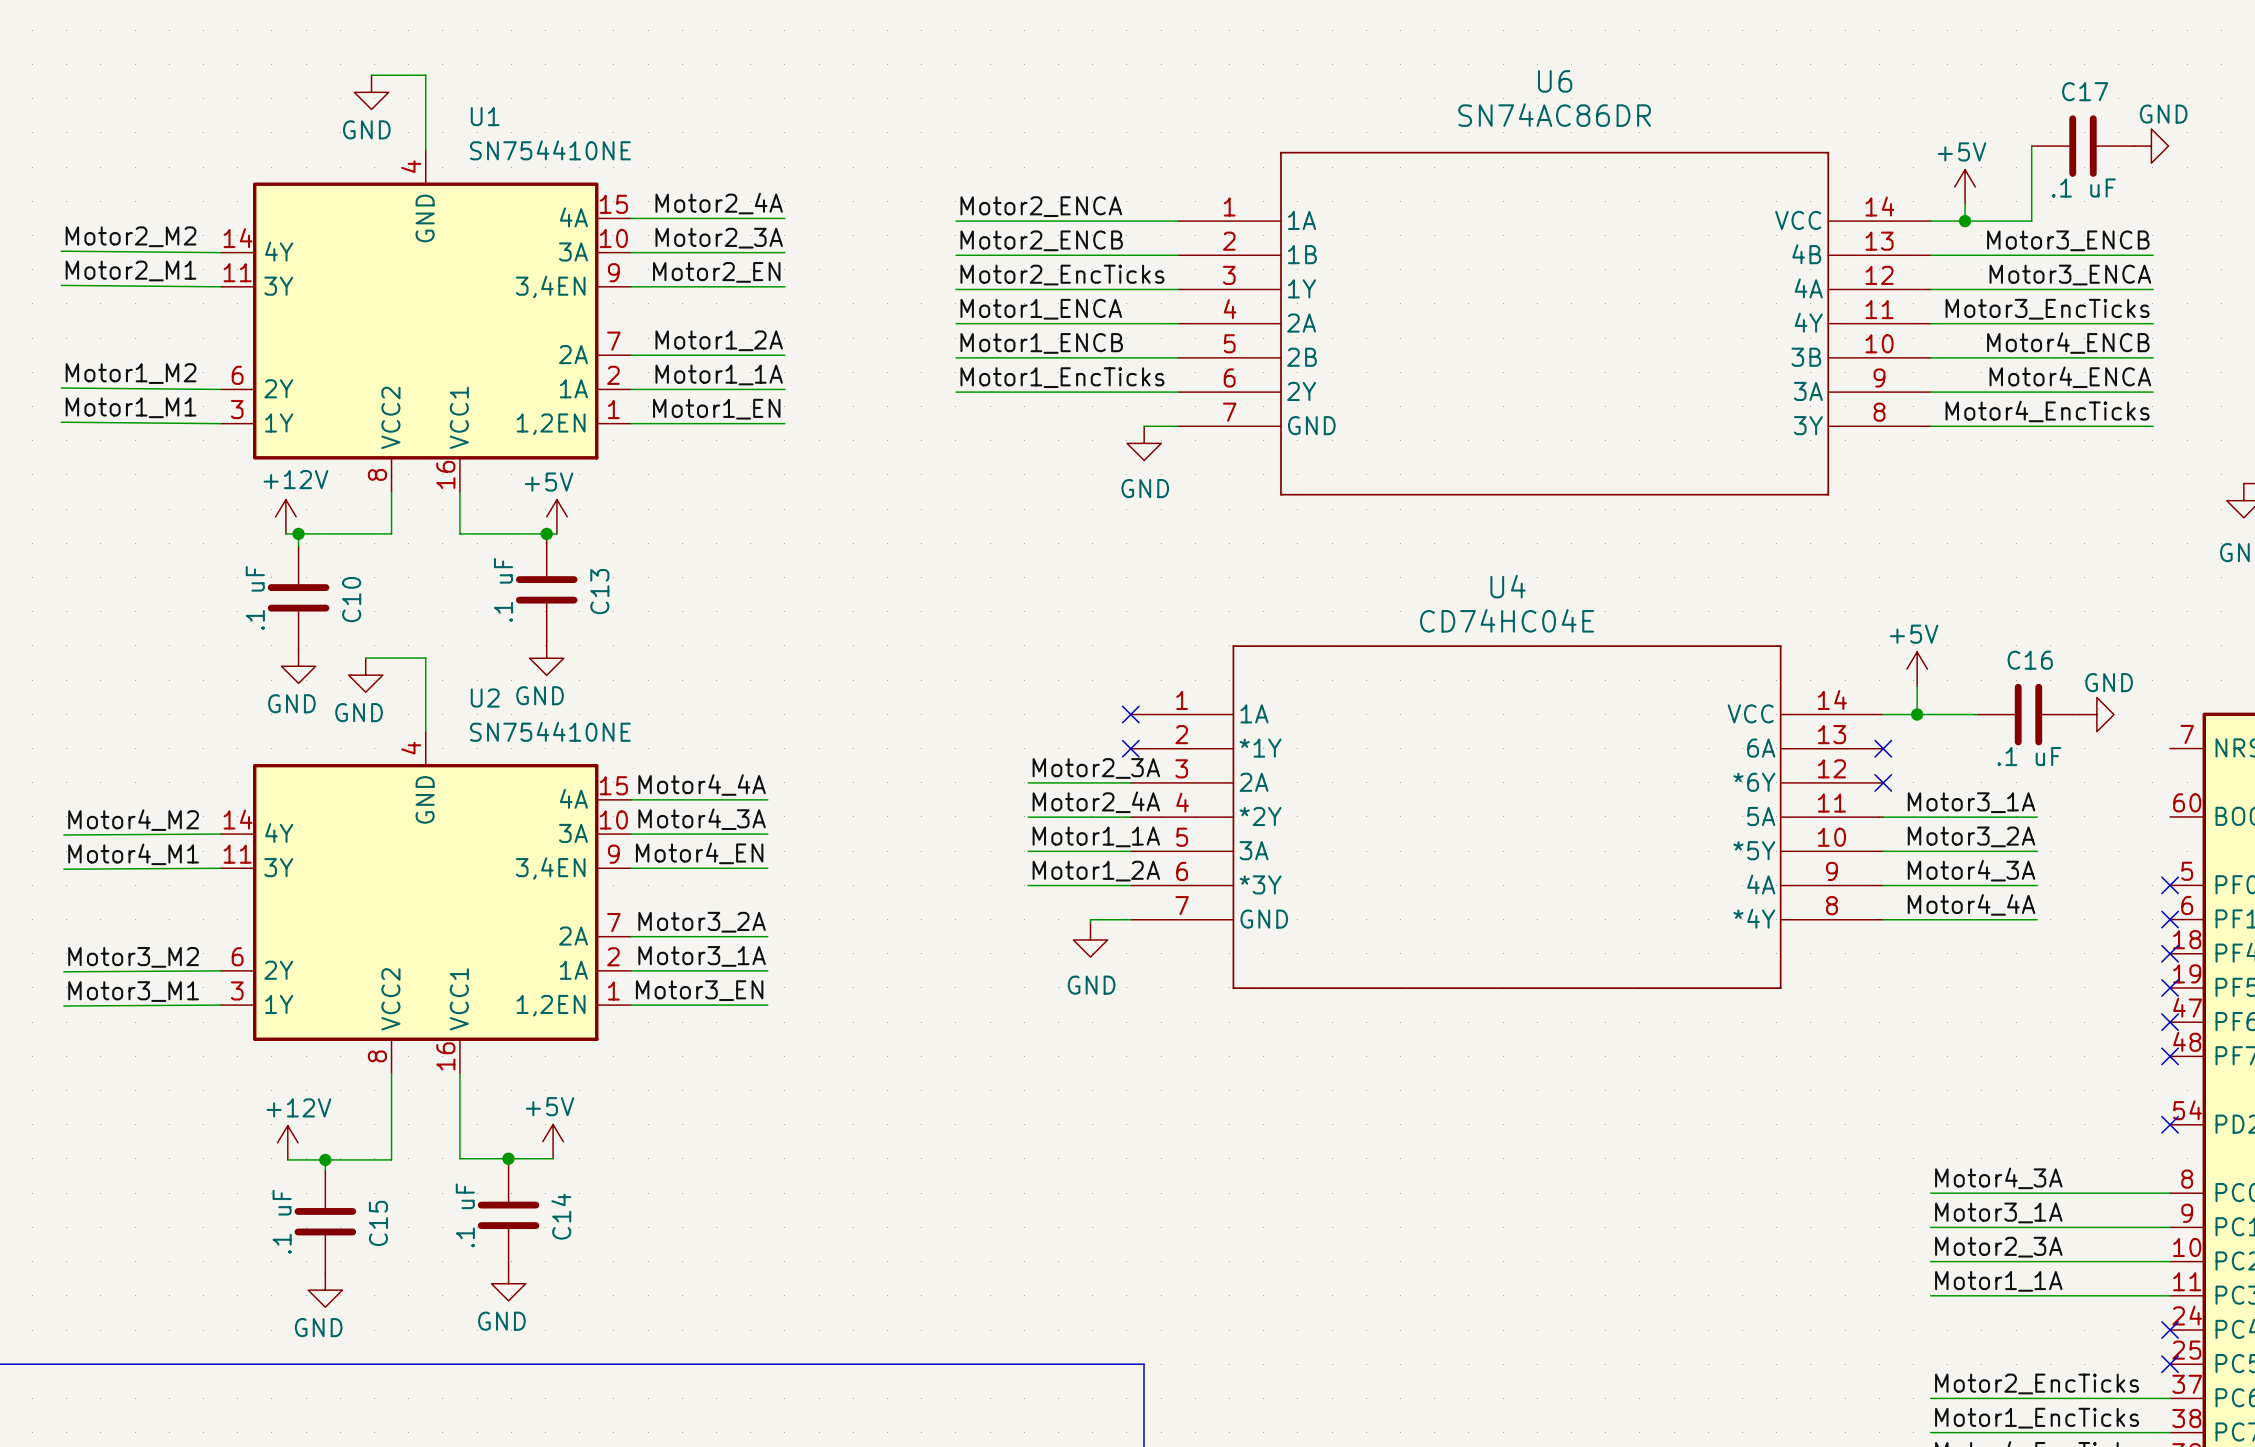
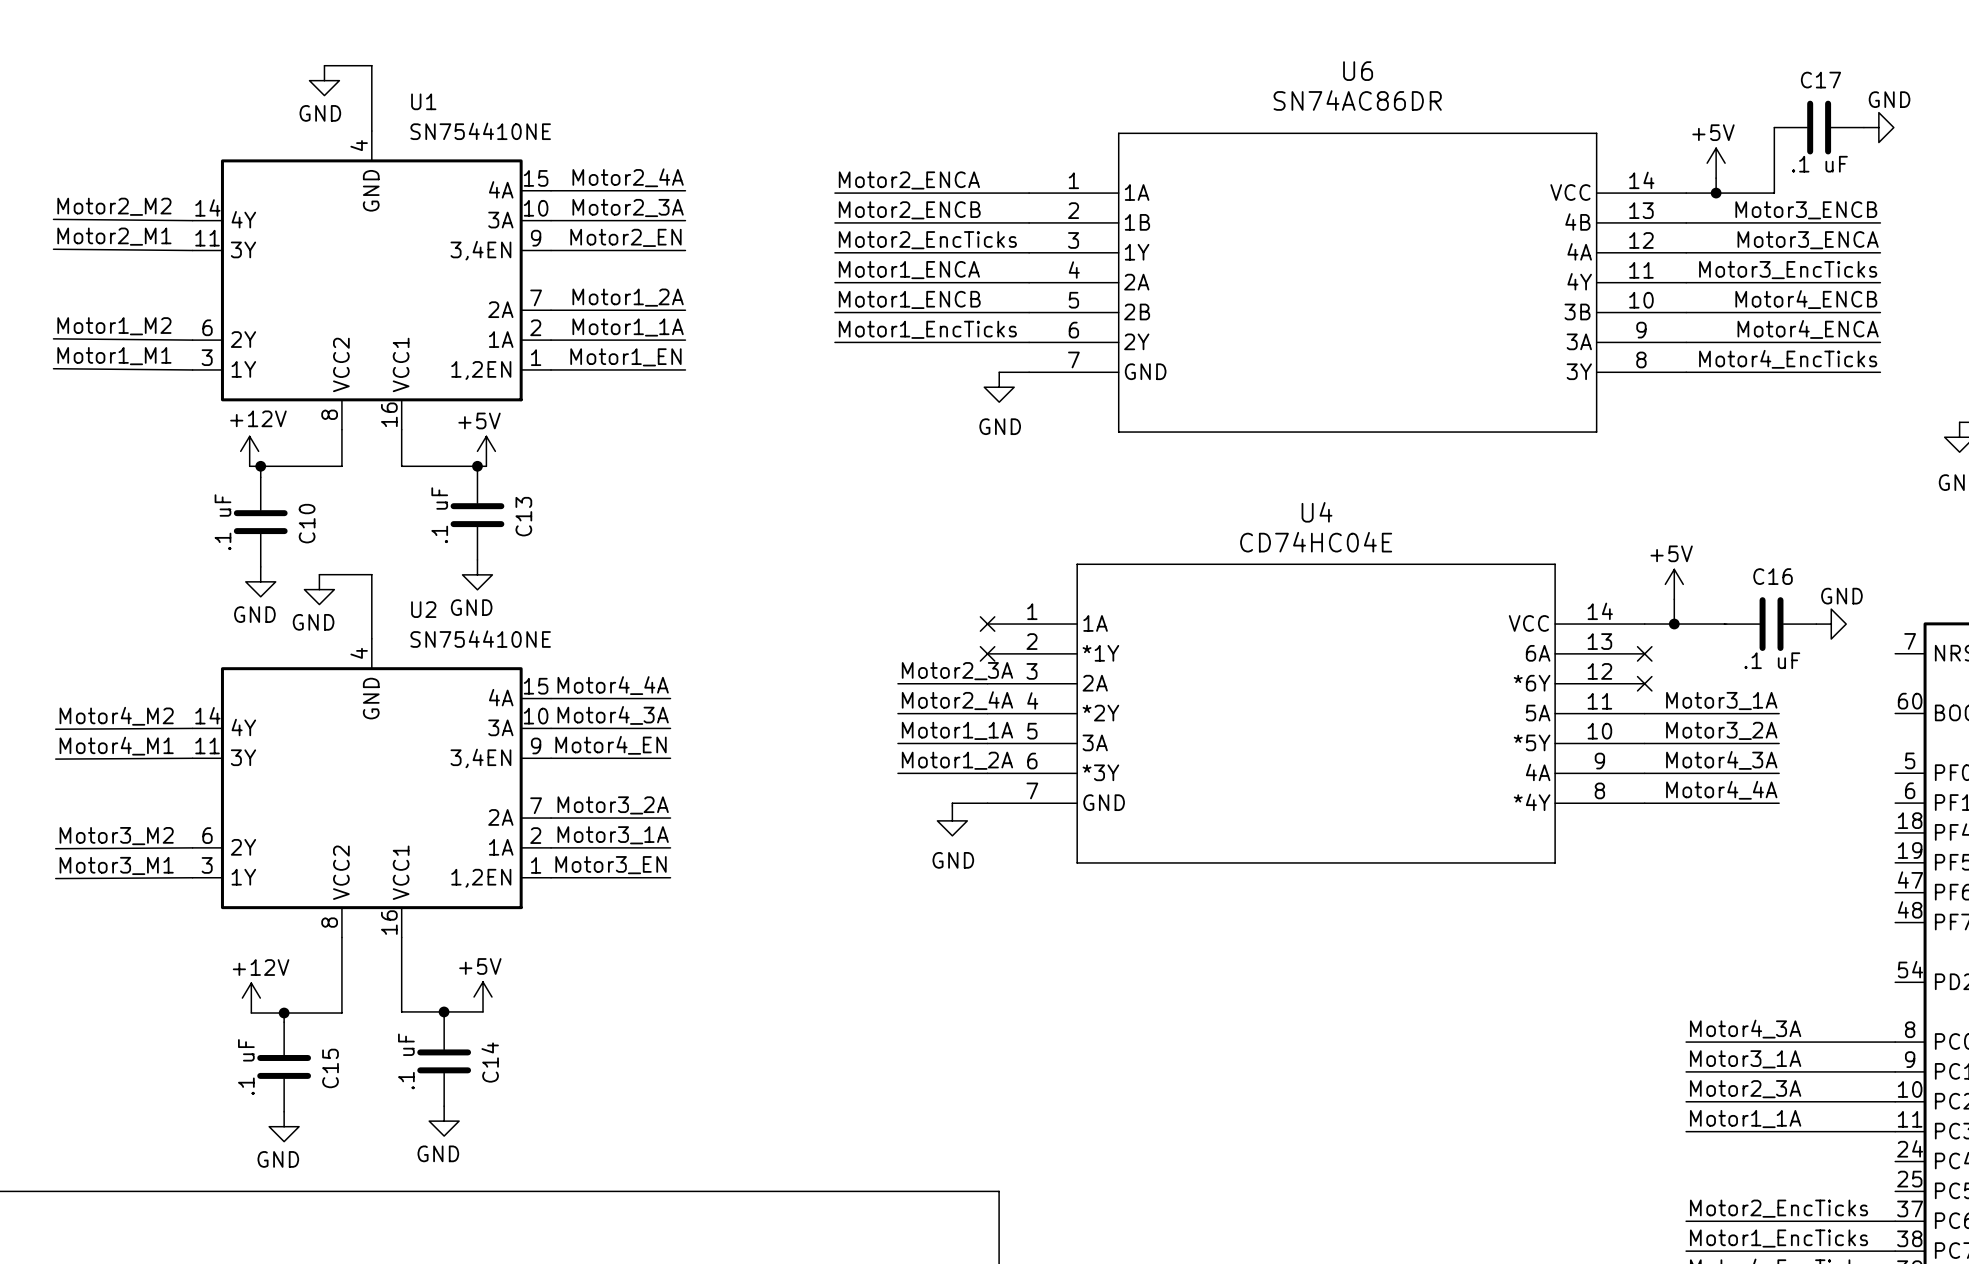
no-connect mark: (2170, 885) -> none
no-connect mark: (2170, 919) -> none
no-connect mark: (2170, 953) -> none
no-connect mark: (2170, 987) -> none
no-connect mark: (2170, 1022) -> none
no-connect mark: (2170, 1056) -> none
no-connect mark: (2170, 1124) -> none
no-connect mark: (2170, 1330) -> none
no-connect mark: (2170, 1364) -> none

